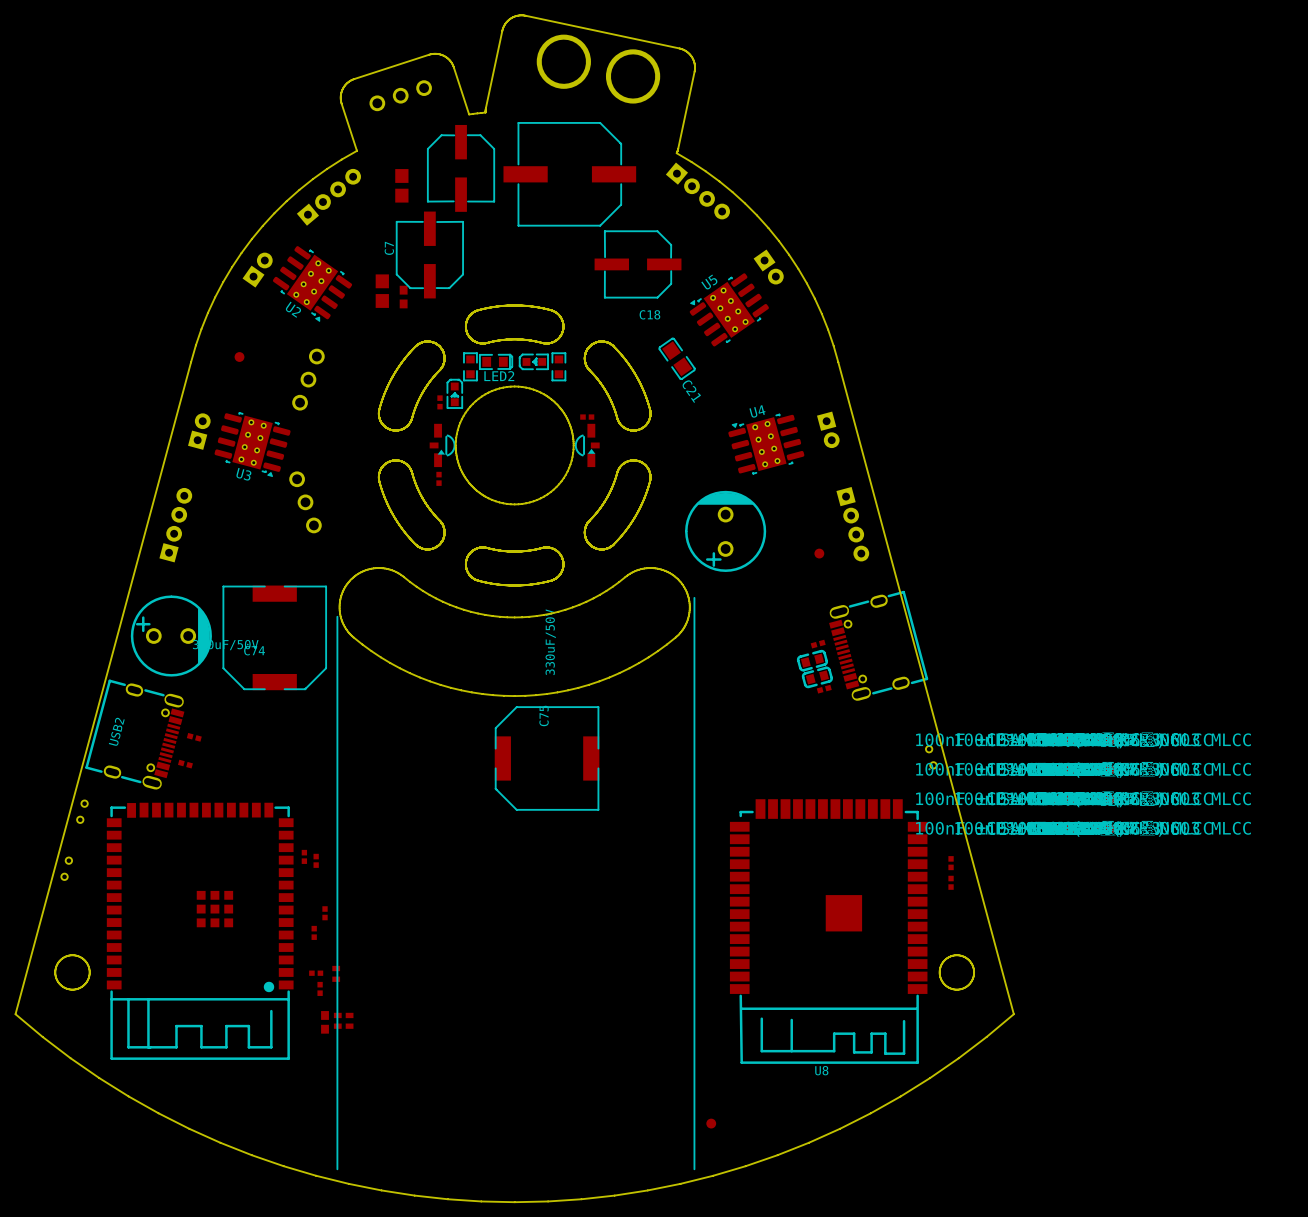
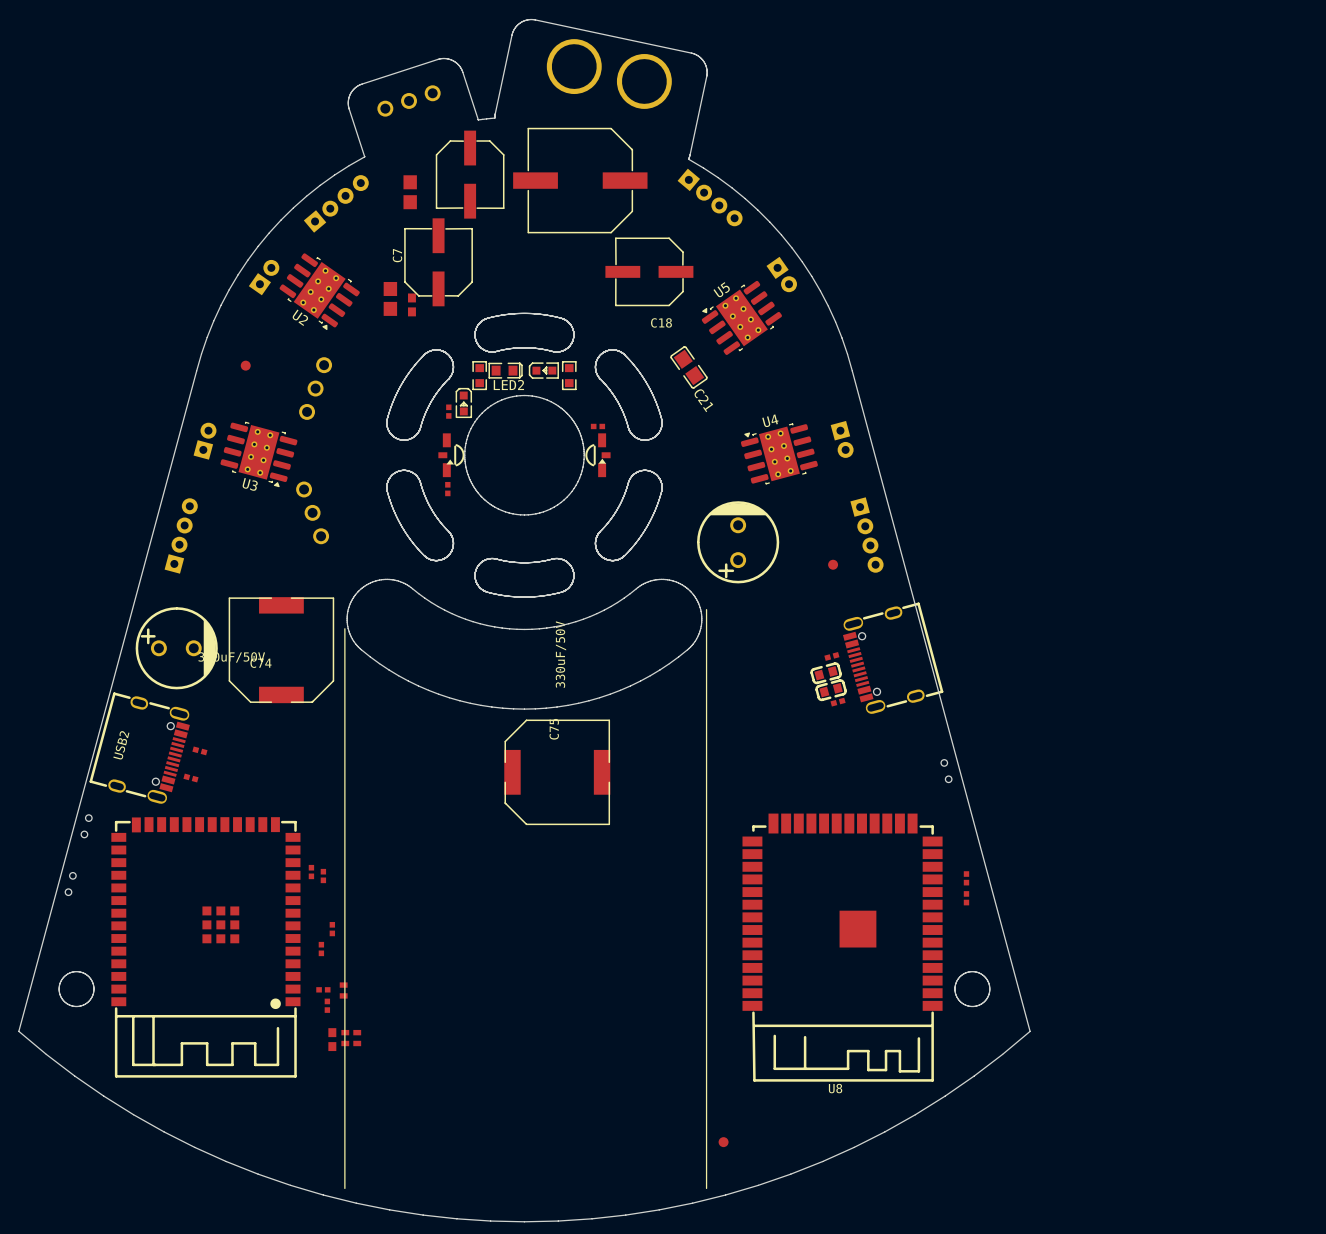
part: (1063, 740) -> none
part: (1102, 740) -> none
part: (1063, 769) -> none
part: (1102, 769) -> none
part: (1063, 799) -> none
part: (1102, 799) -> none
part: (1063, 828) -> none
part: (1102, 828) -> none

